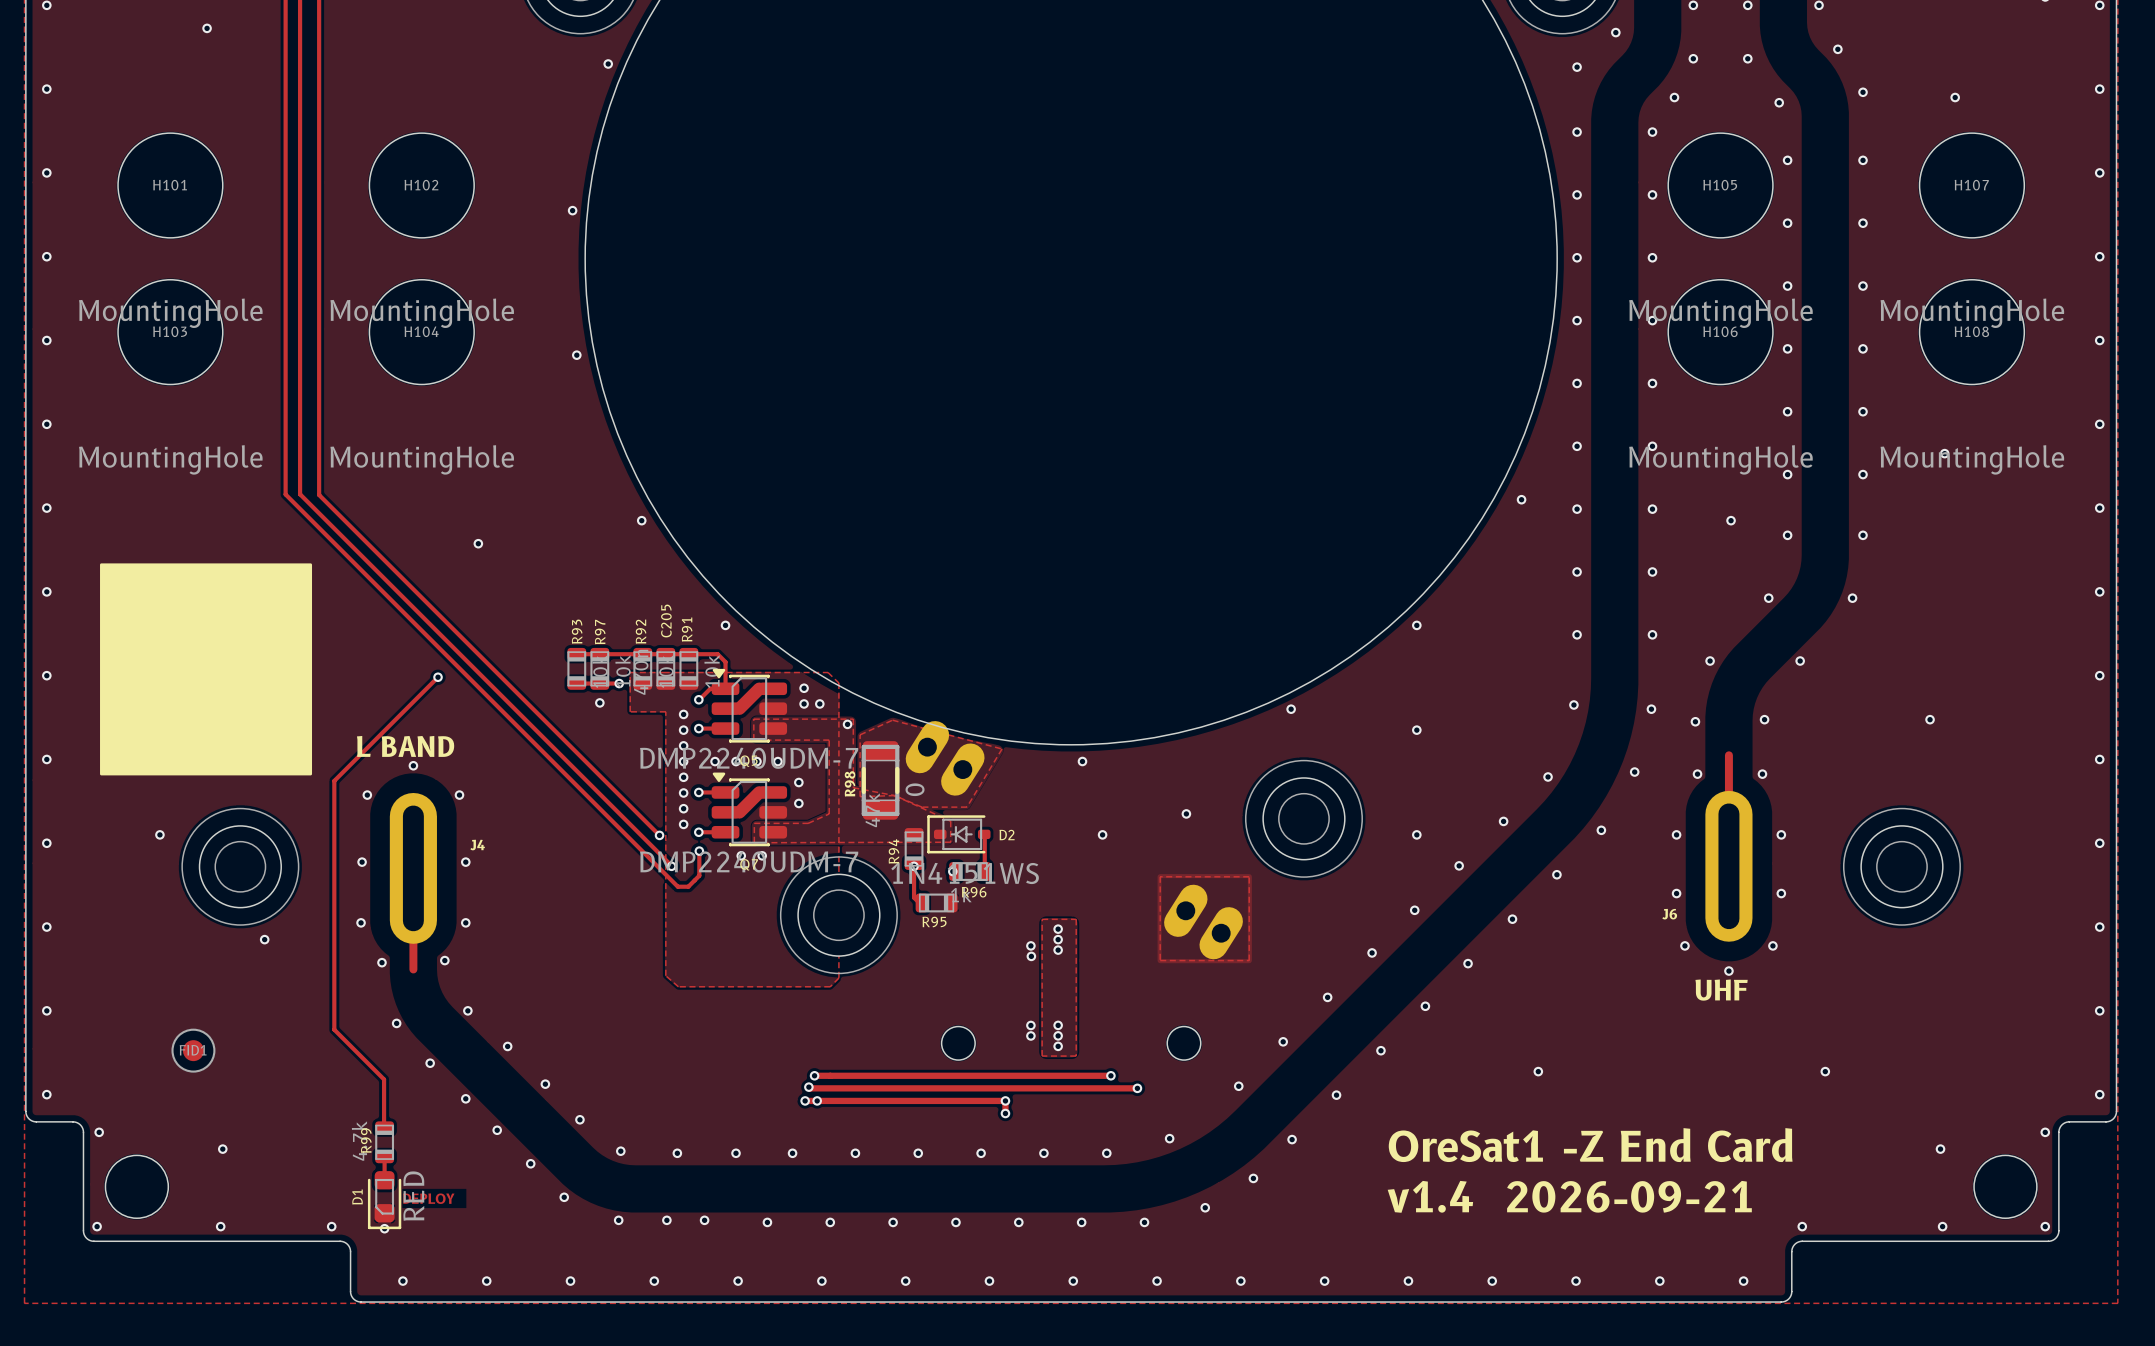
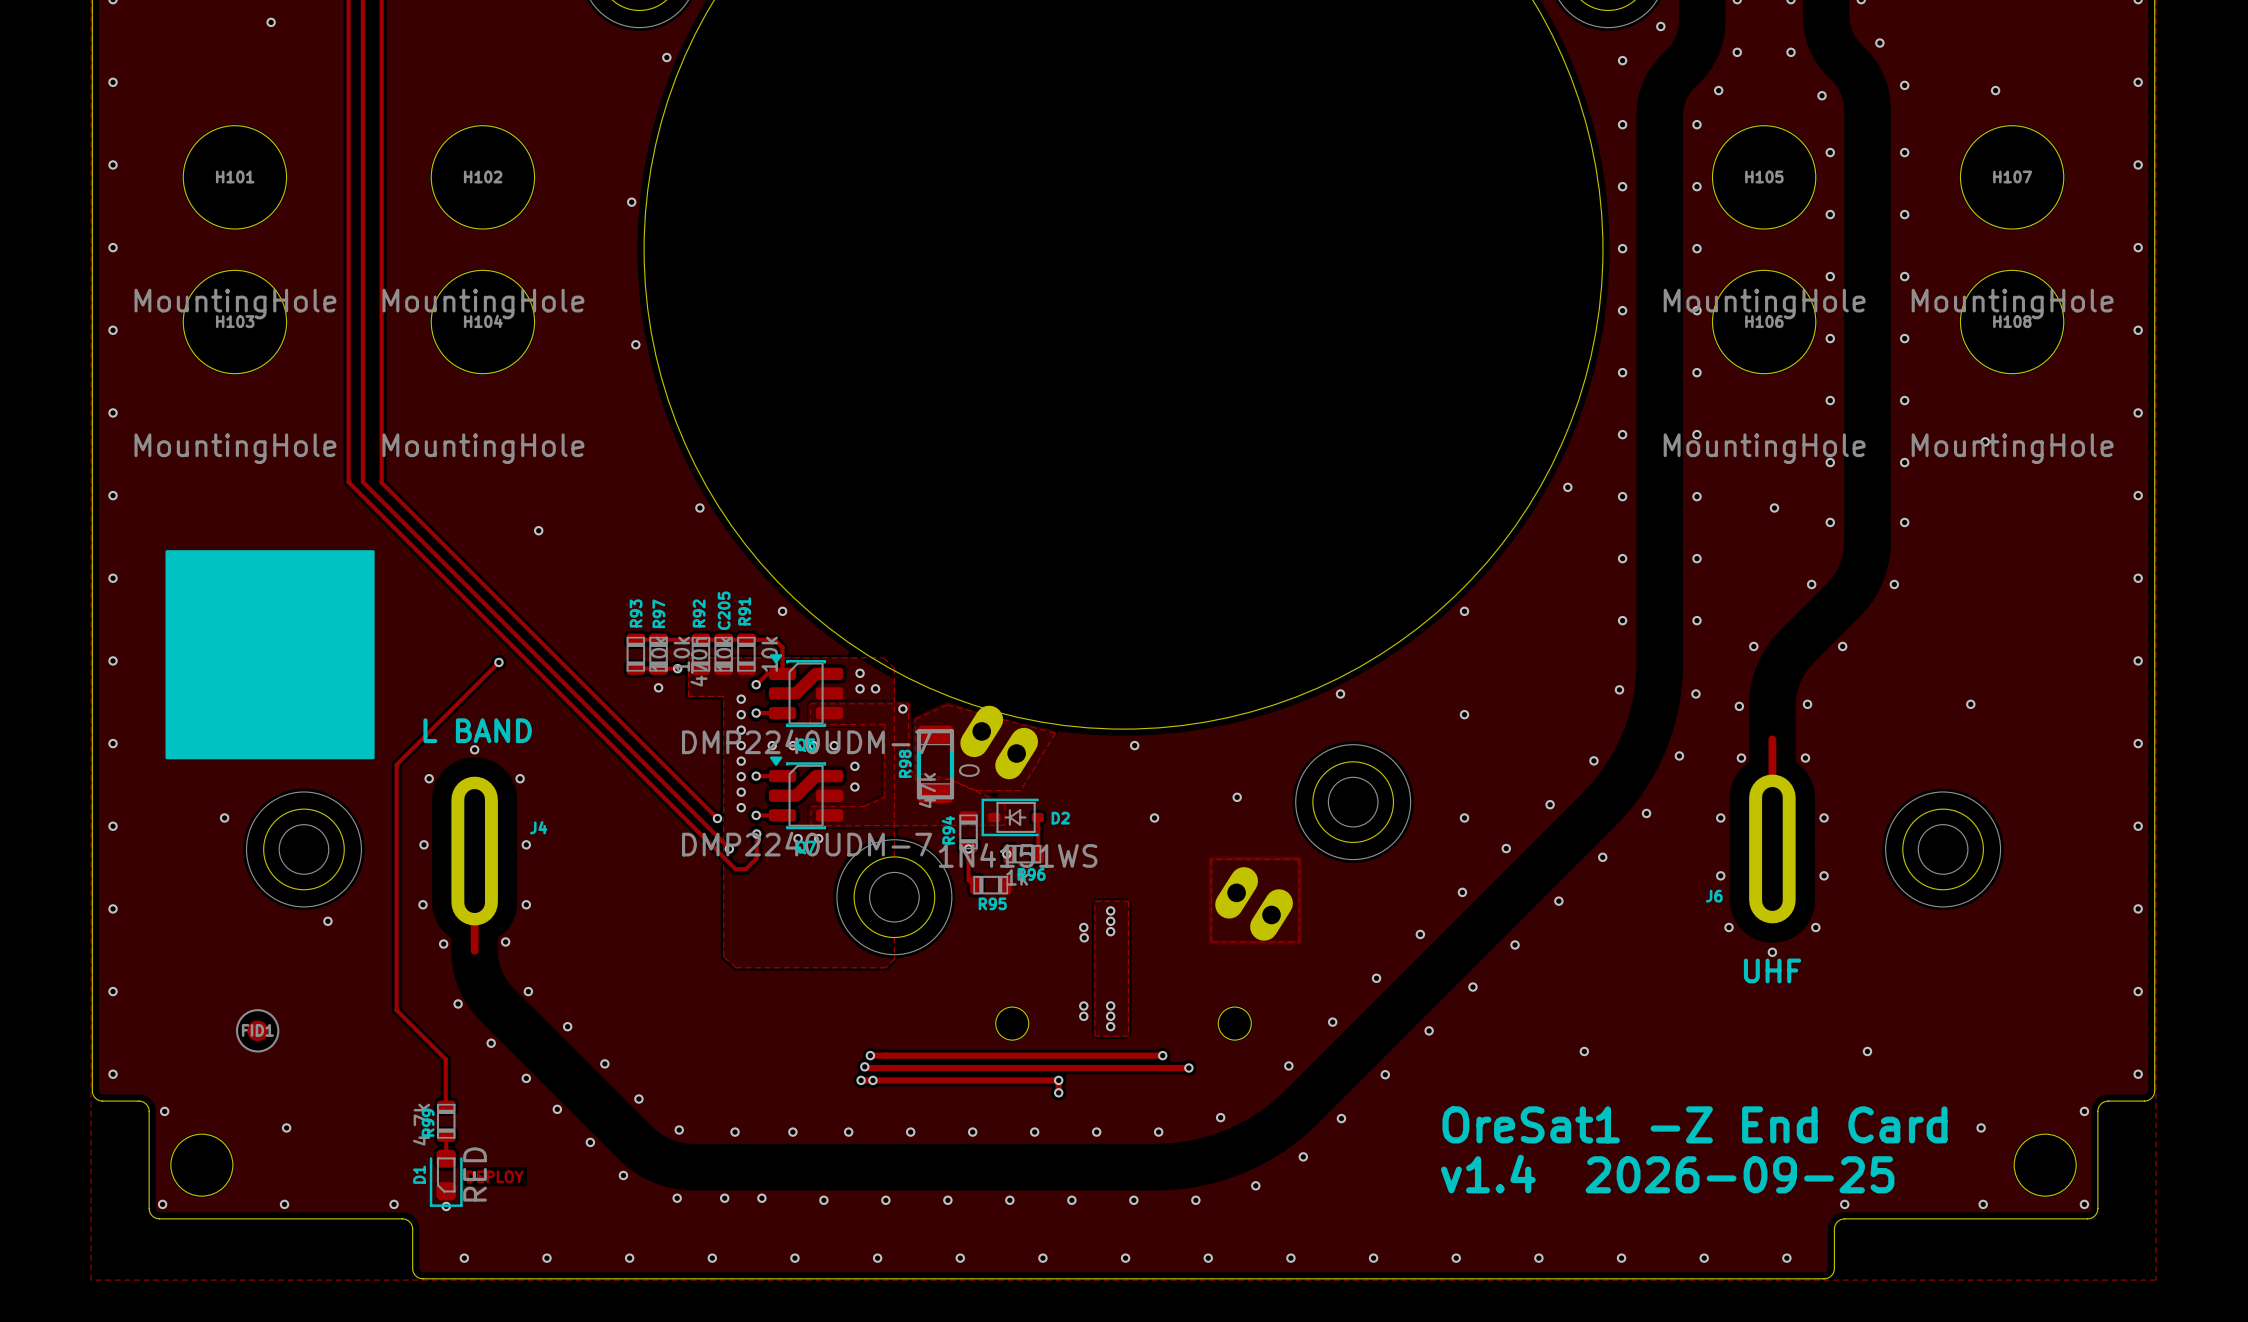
text: v1.4 2026-09-21 (1569, 1196) -> v1.4 2026-09-25 (1667, 1174)

